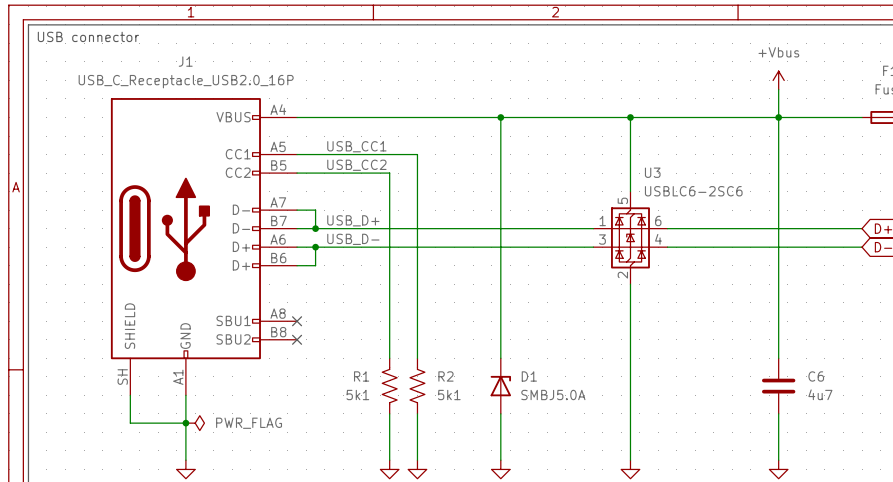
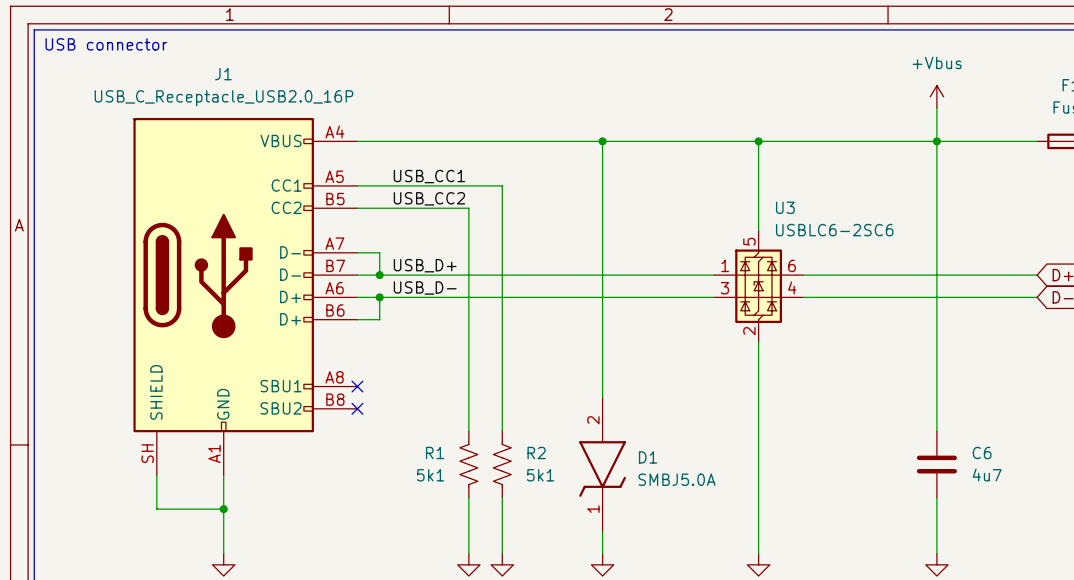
D1 symbol: [490, 358, 512, 414] -> [579, 397, 626, 532]
power symbol: PWR_FLAG (195, 423) -> none

